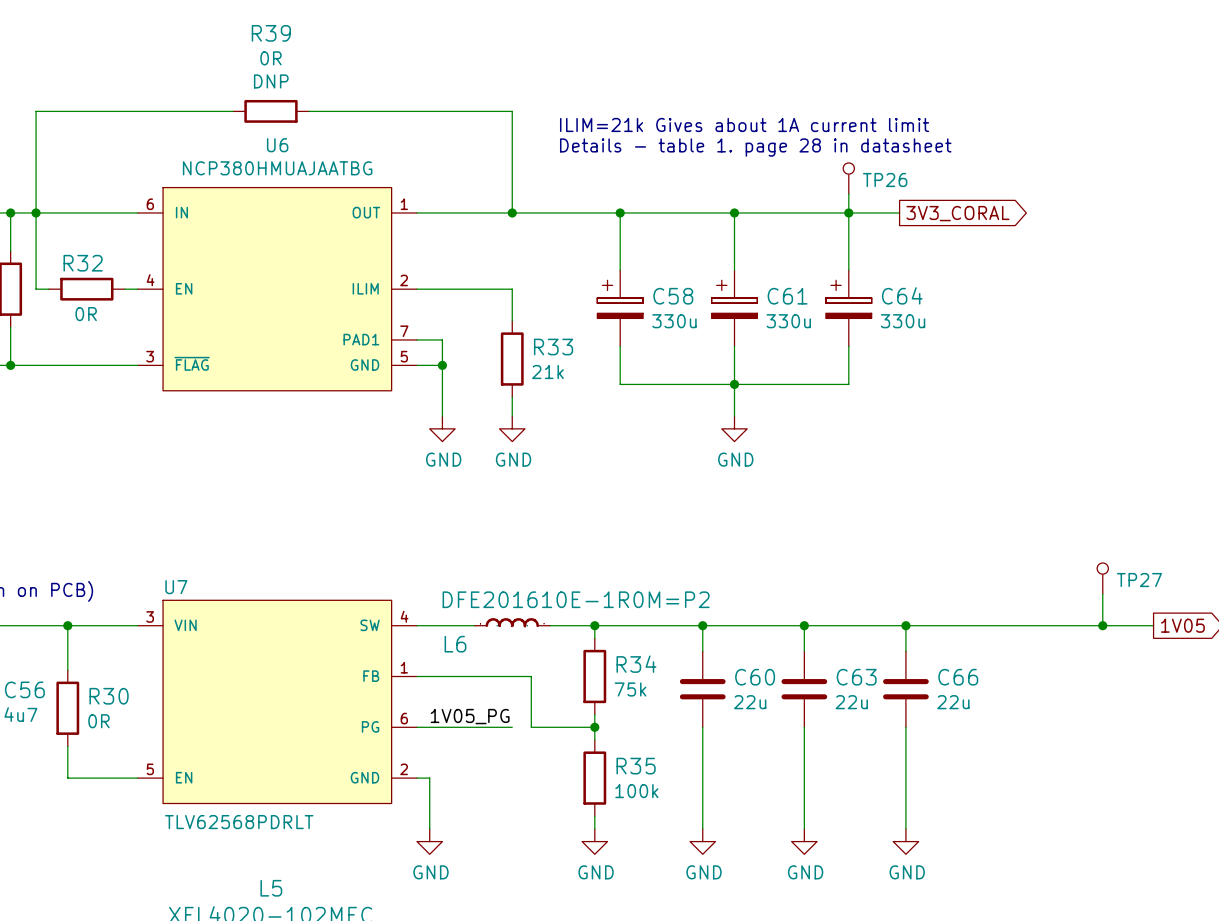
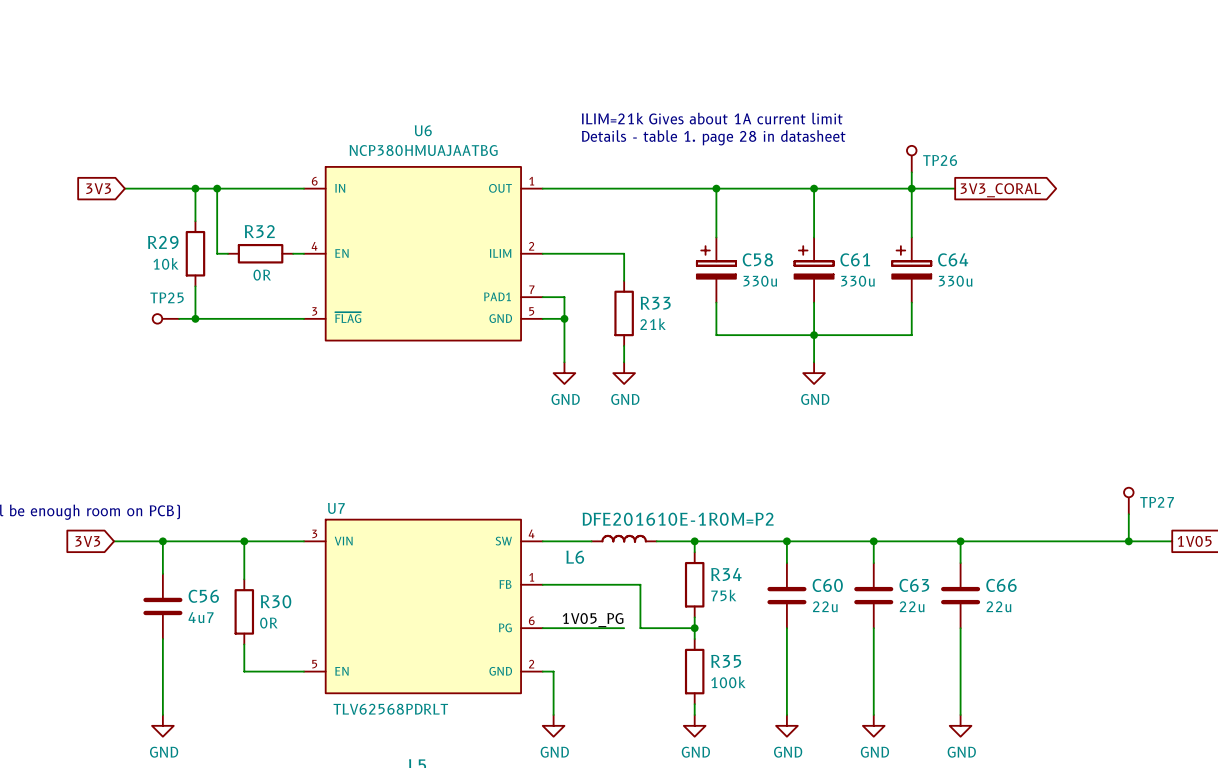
wire: (232, 111) (36, 111) (36, 212) -> none
R39: (270, 111) -> none
wire: (309, 111) (512, 111) (512, 212) -> none
text position: ILIM=21k Gives about 1A current limit (744, 124) -> ILIM=21k Gives about 1A current limit (712, 118)
text position: Details - table 1. page 28 in datasheet (755, 147) -> Details - table 1. page 28 in datasheet (713, 137)
junction: (512, 212) -> none

